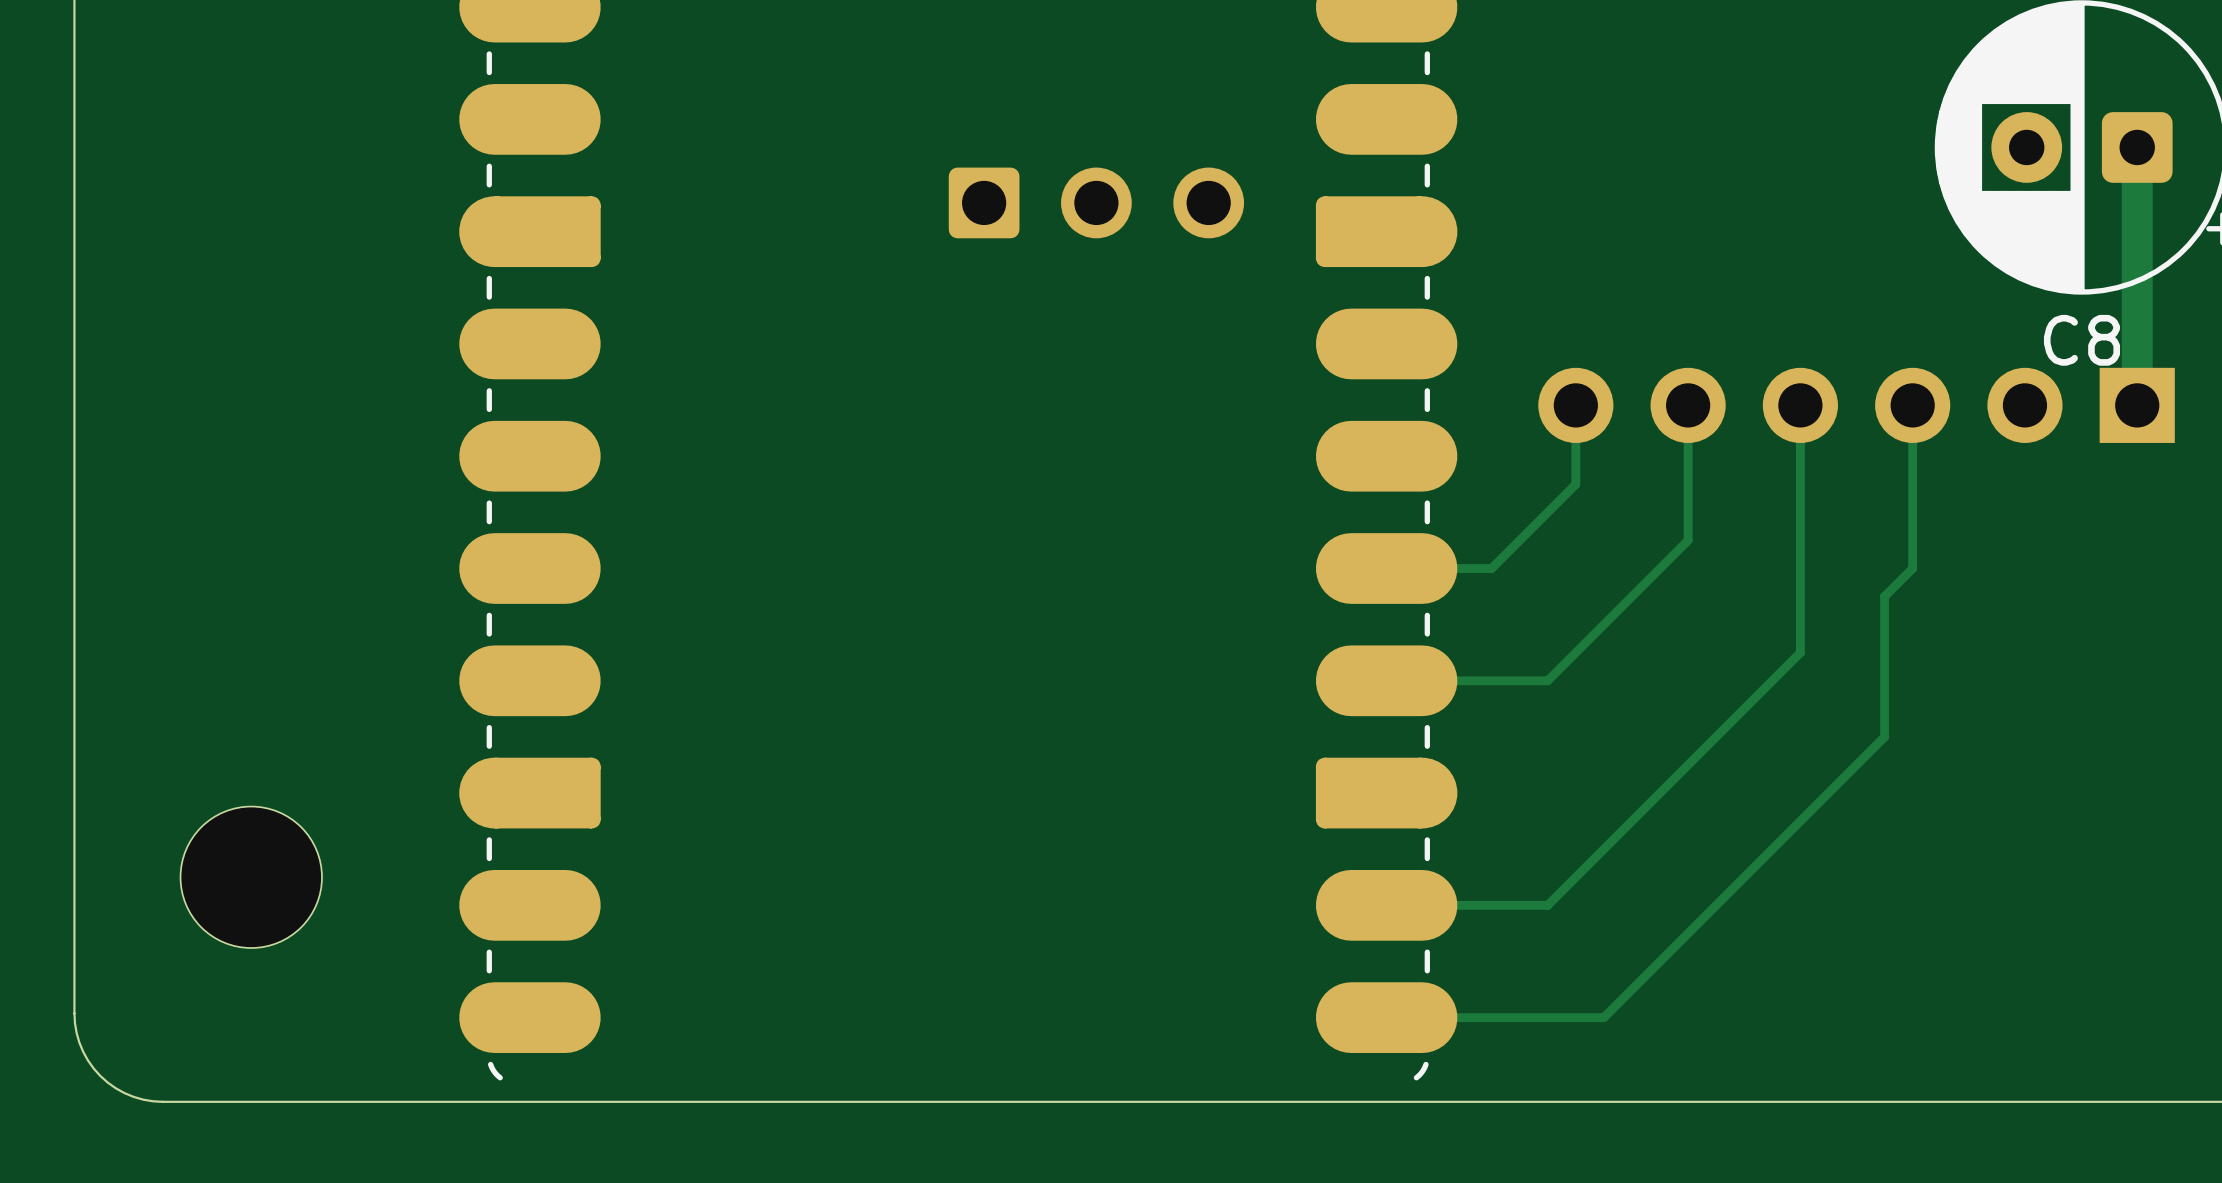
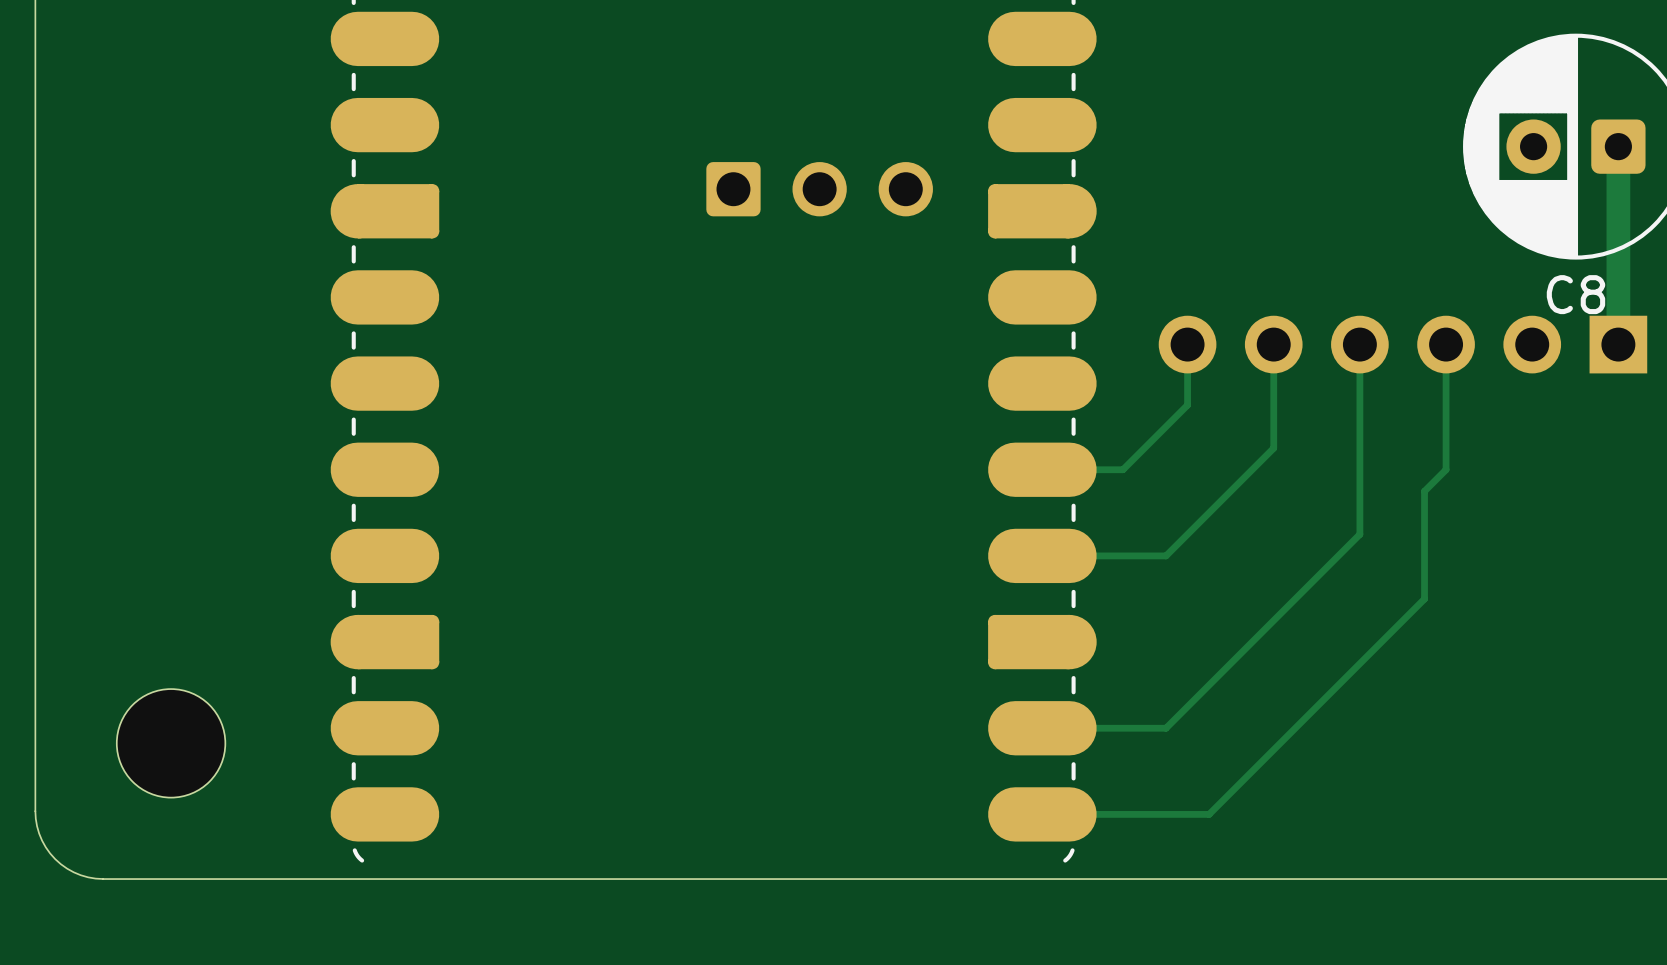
part position: (251, 877) -> (171, 743)

